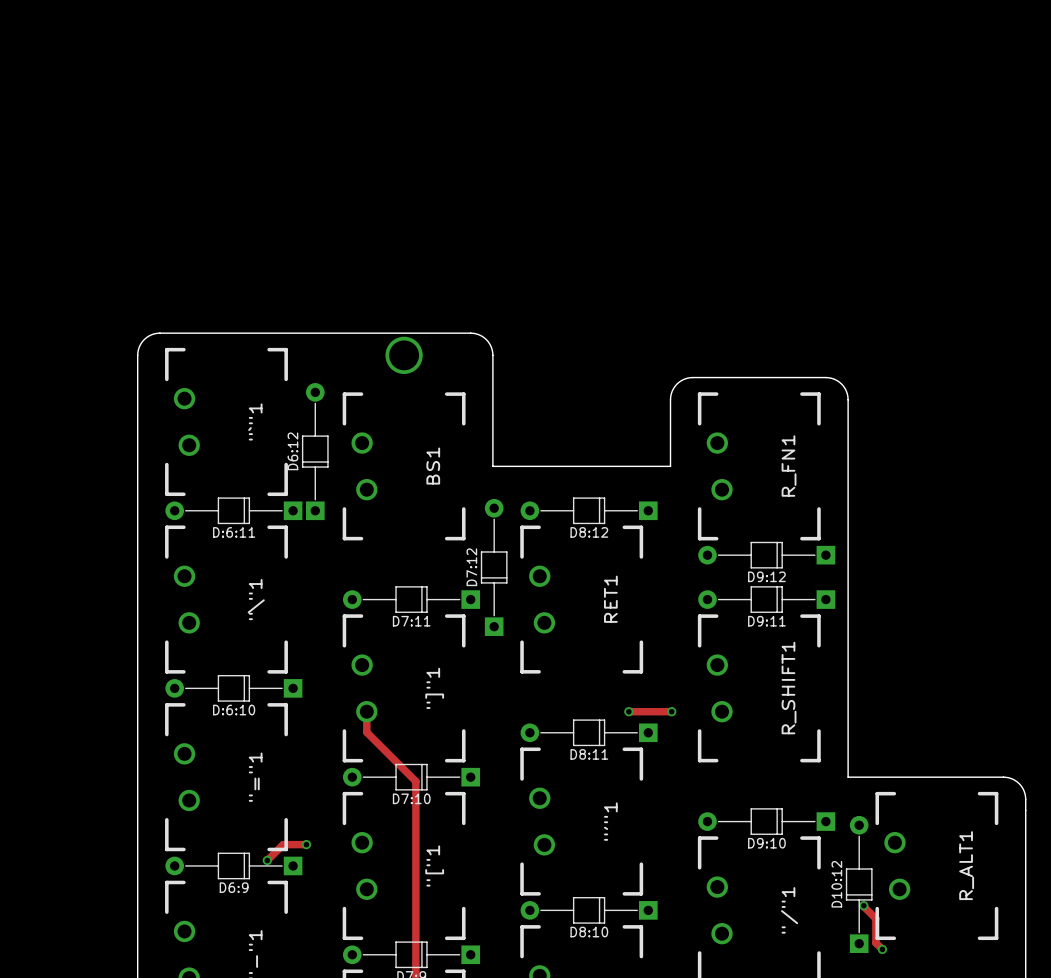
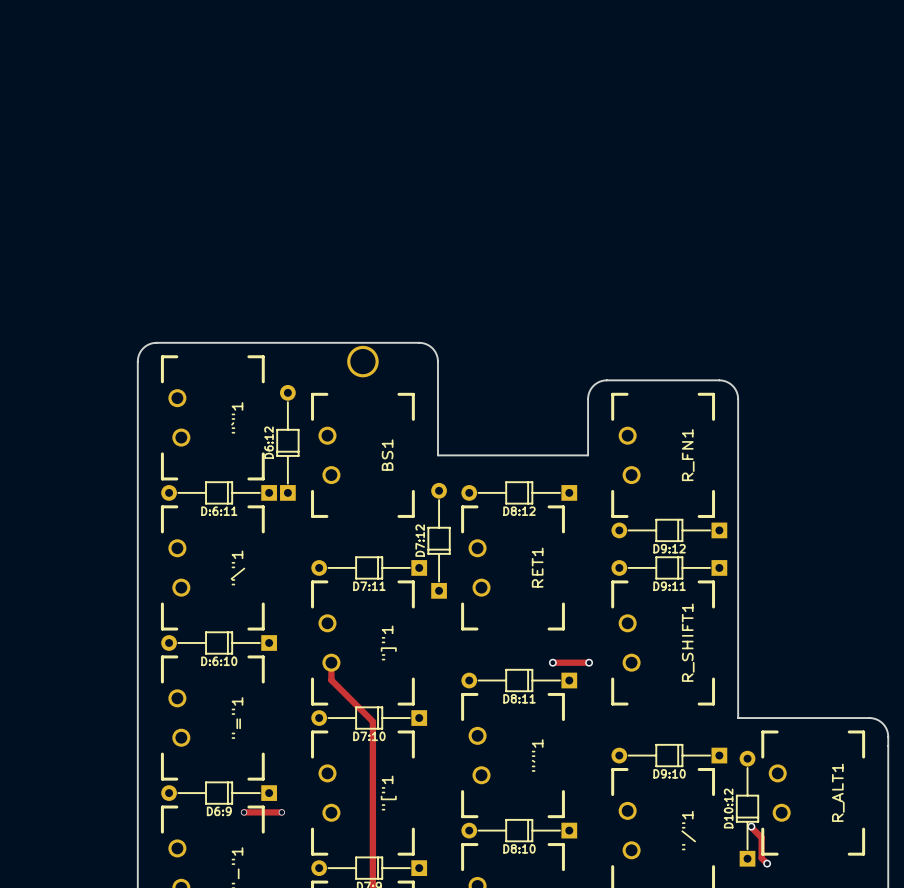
track: (306, 844) (283, 844) (267, 860) -> none
via: (306, 844) -> none
via: (267, 860) -> none
track: none -> (244, 812) (281, 812)
via: none -> (244, 812)
via: none -> (281, 812)

